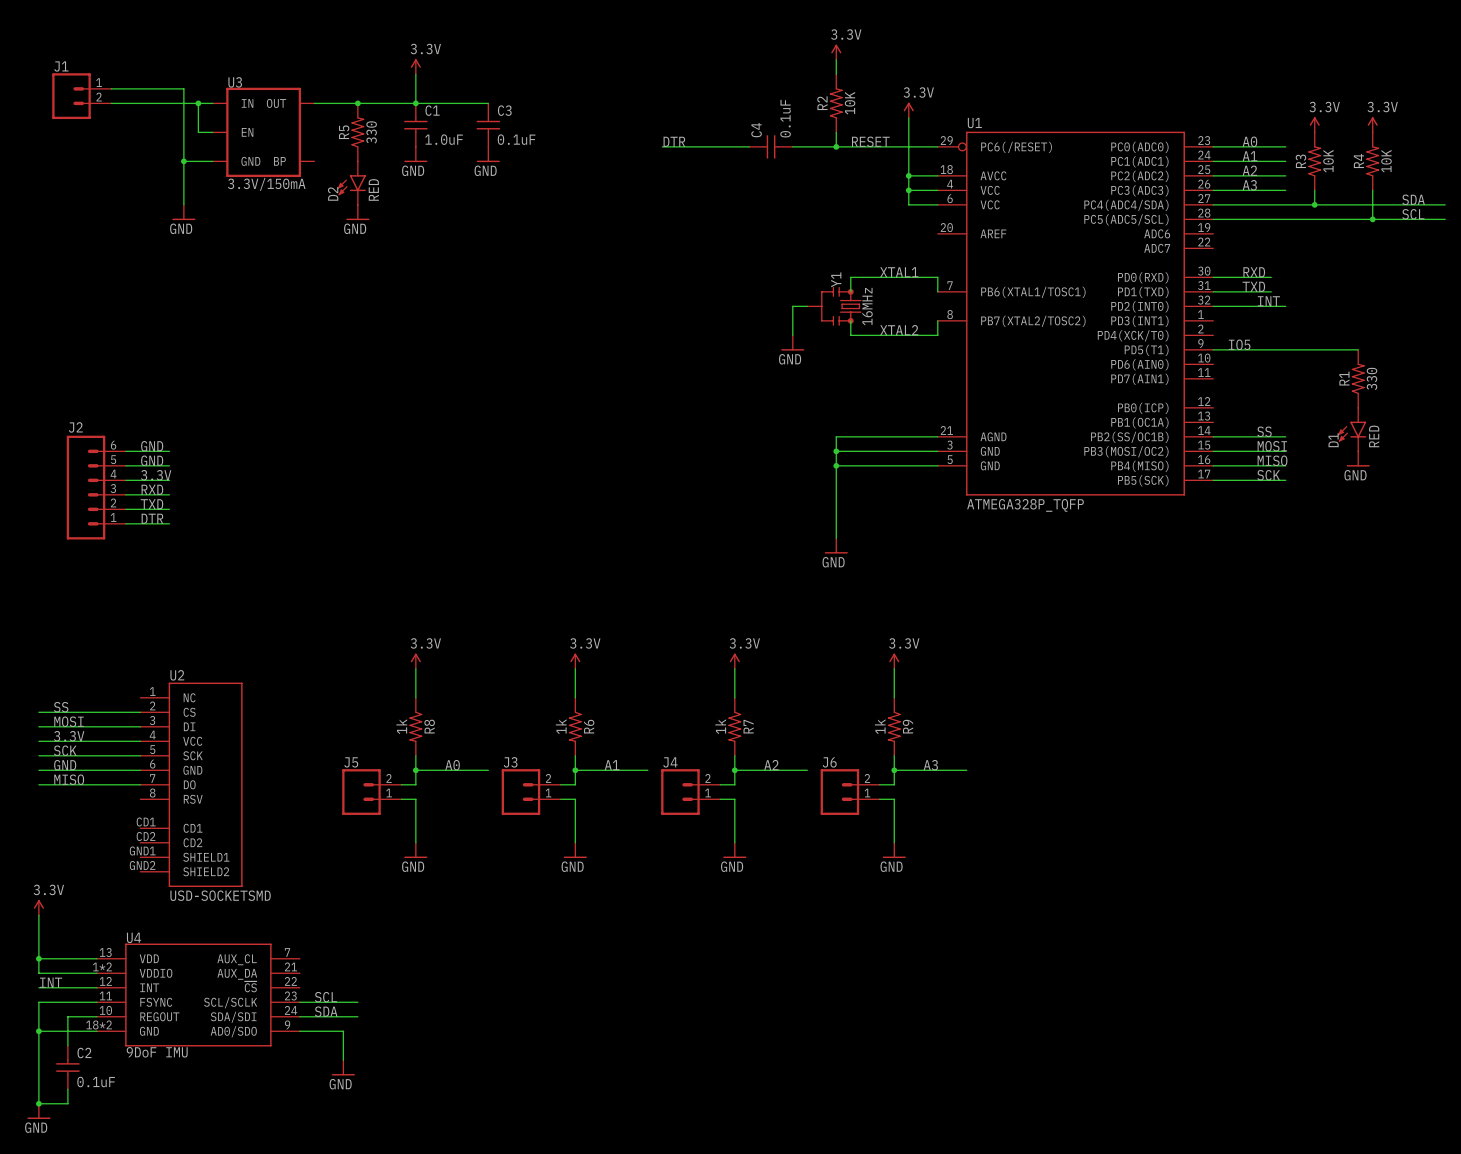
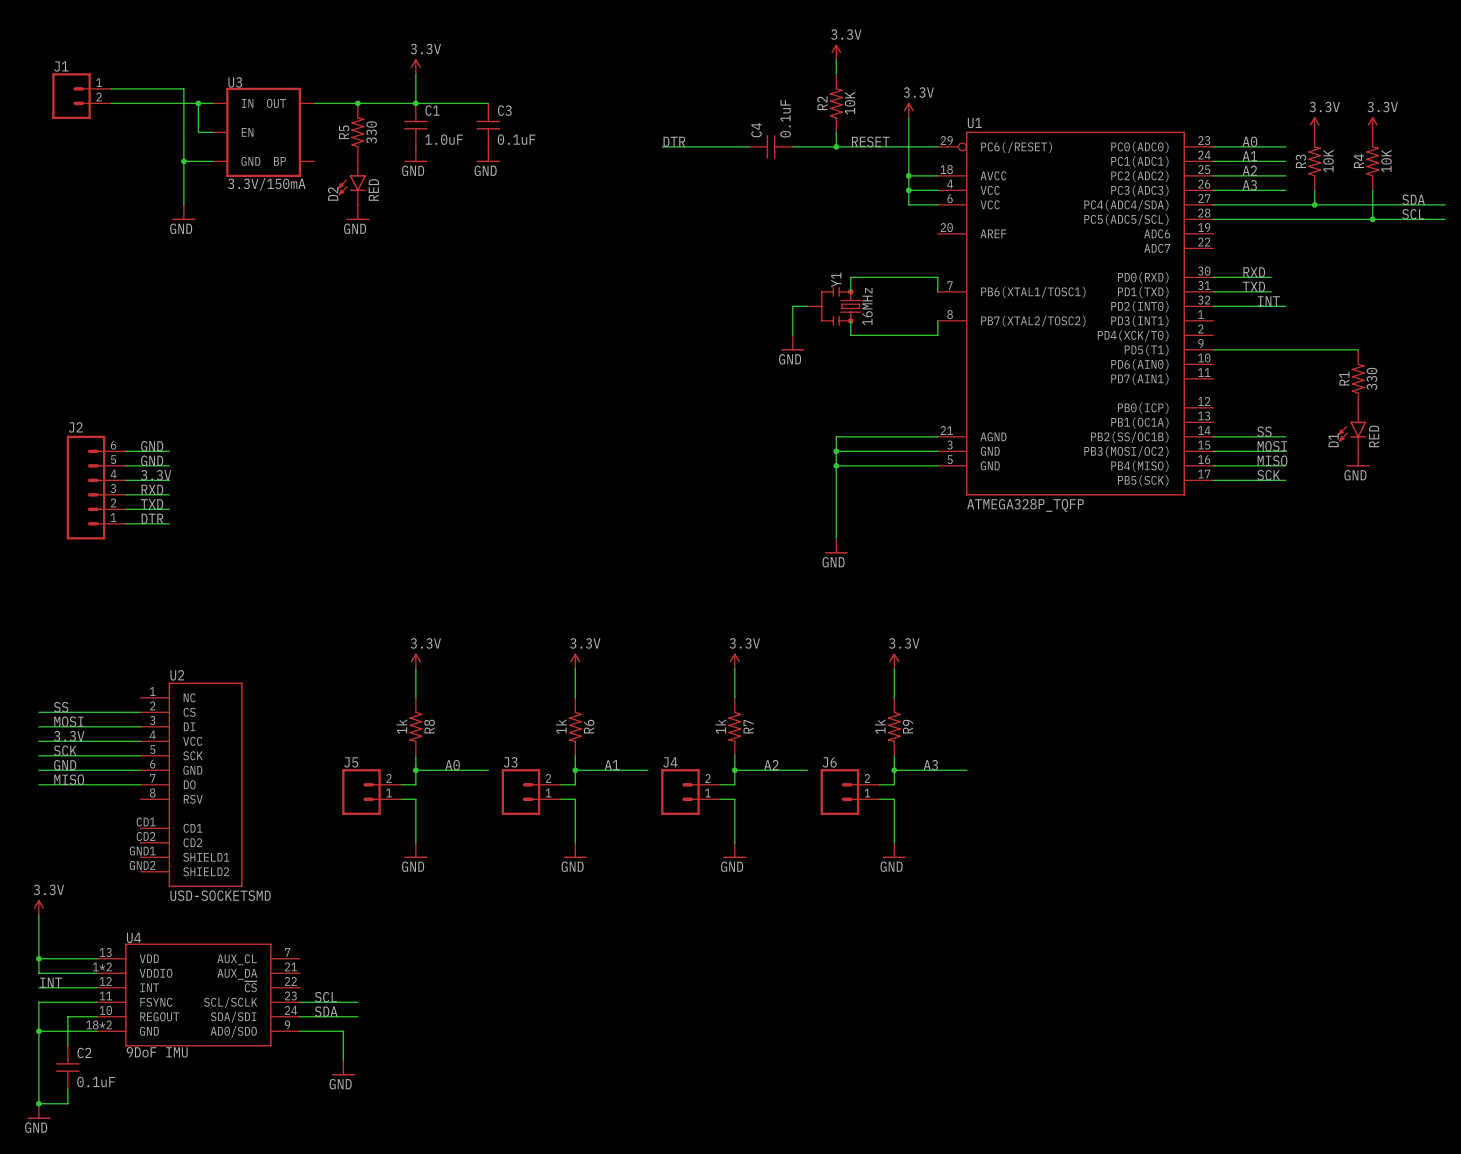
label: XTAL1 (899, 272) -> none
label: XTAL2 (899, 330) -> none
label: IO5 (1239, 344) -> none

